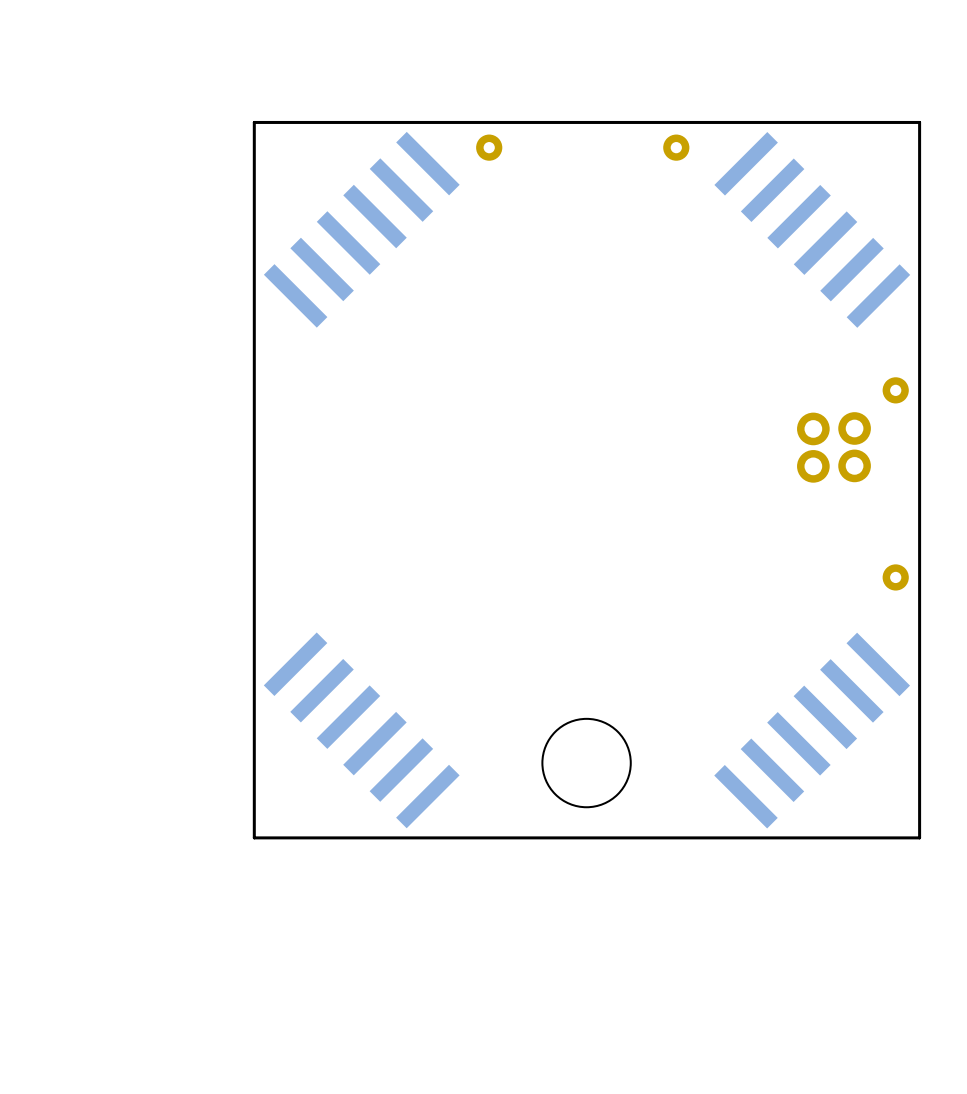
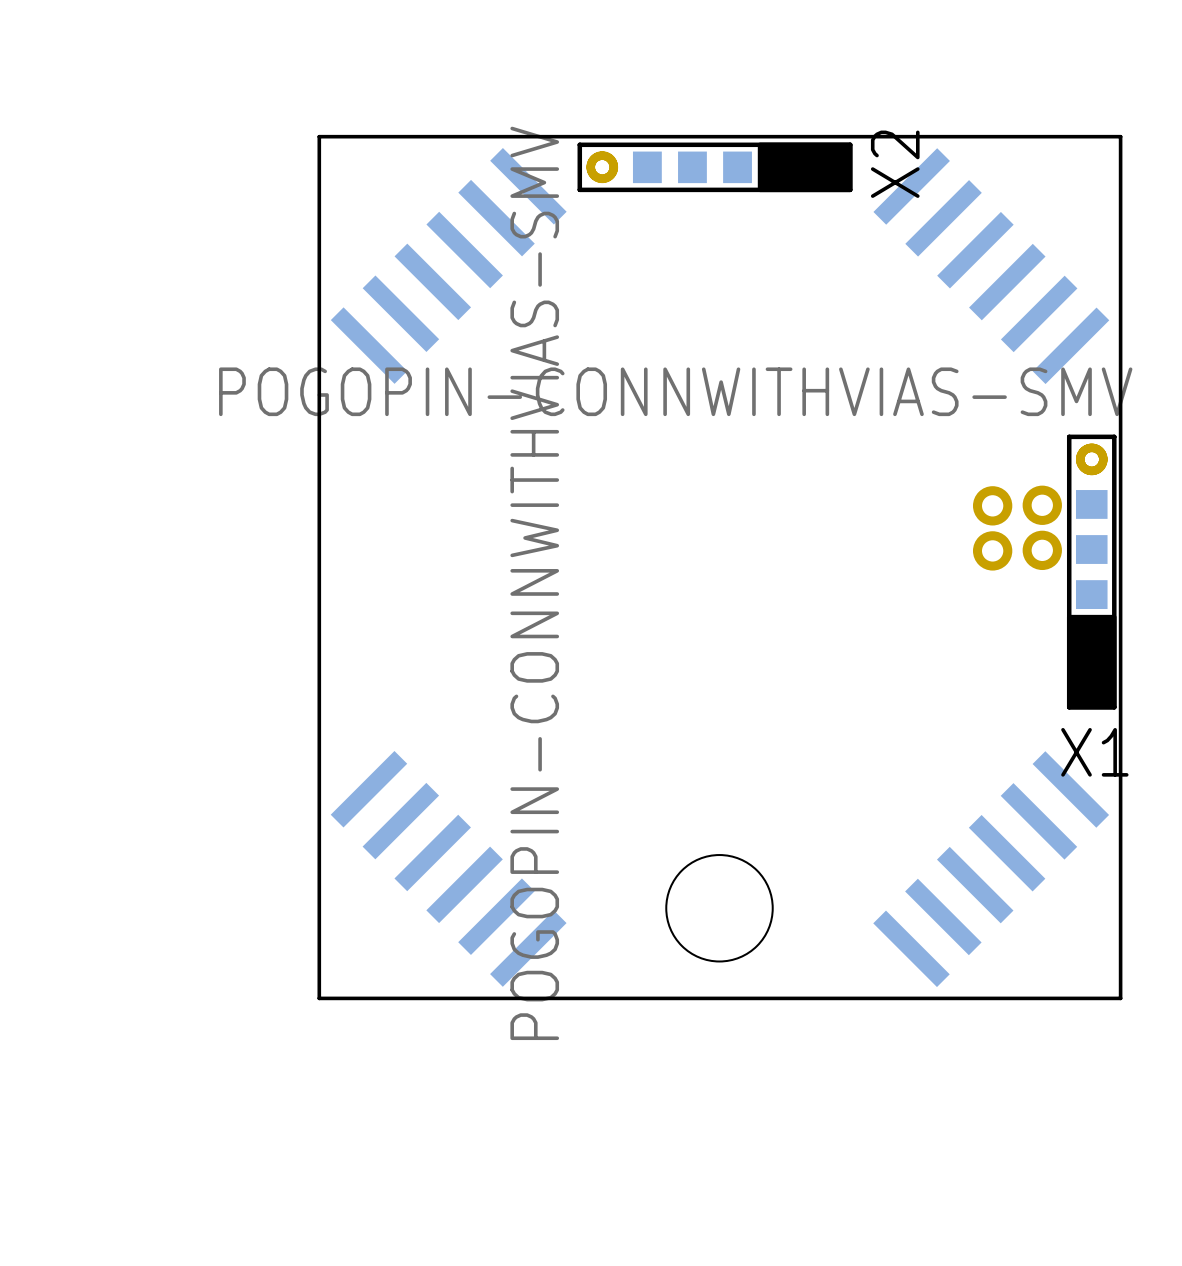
X2: none -> POGOPIN-CONNWITHVIAS-SMV (714, 167)
X1: none -> POGOPIN-CONNWITHVIAS-SMV (1091, 572)

